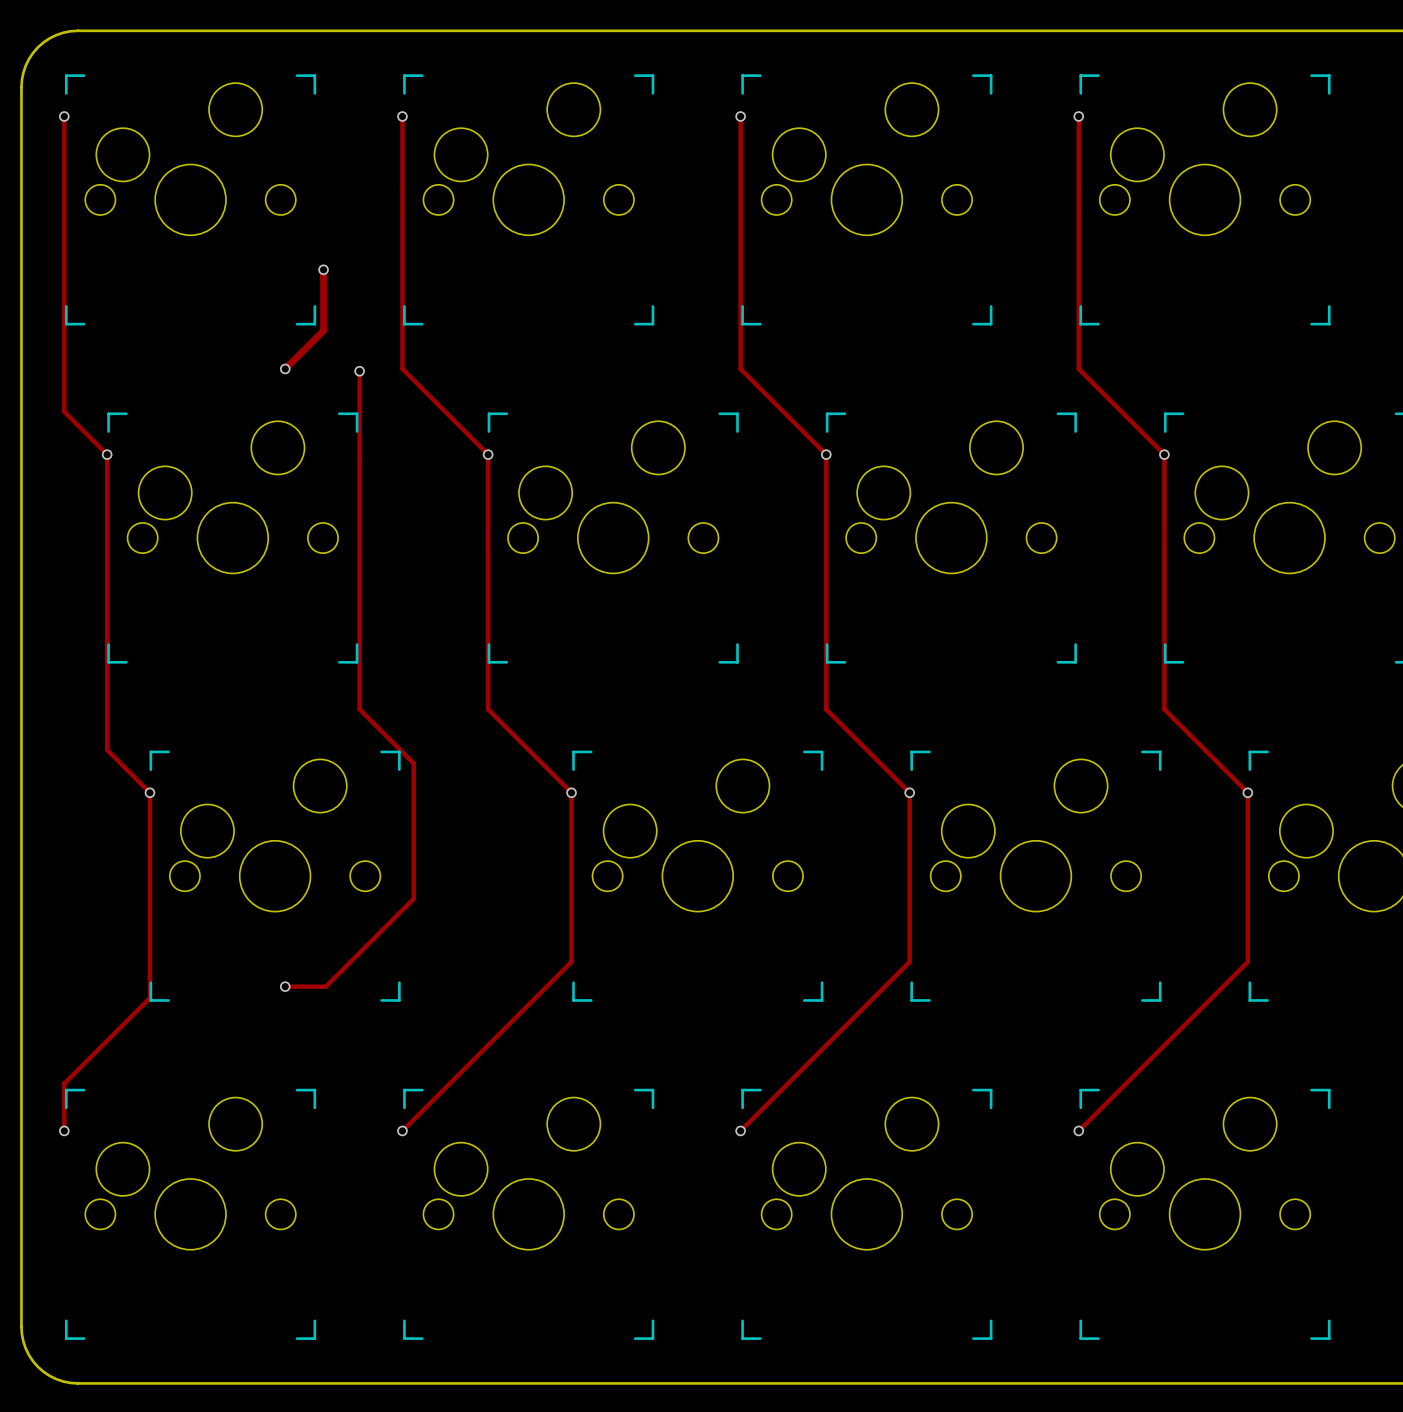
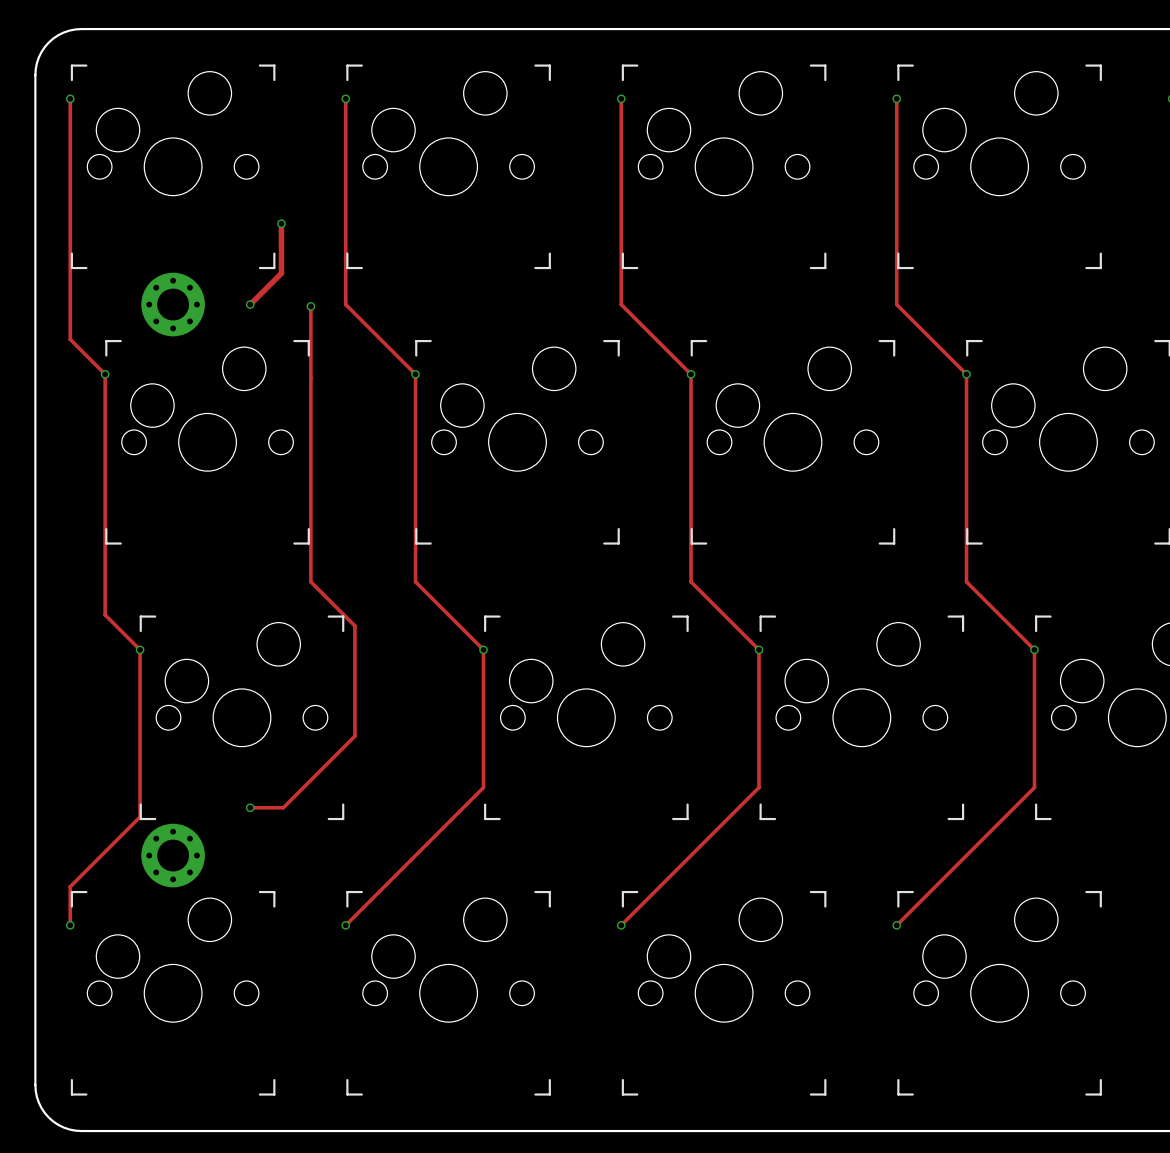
part: none -> (173, 304)
part: none -> (173, 855)

